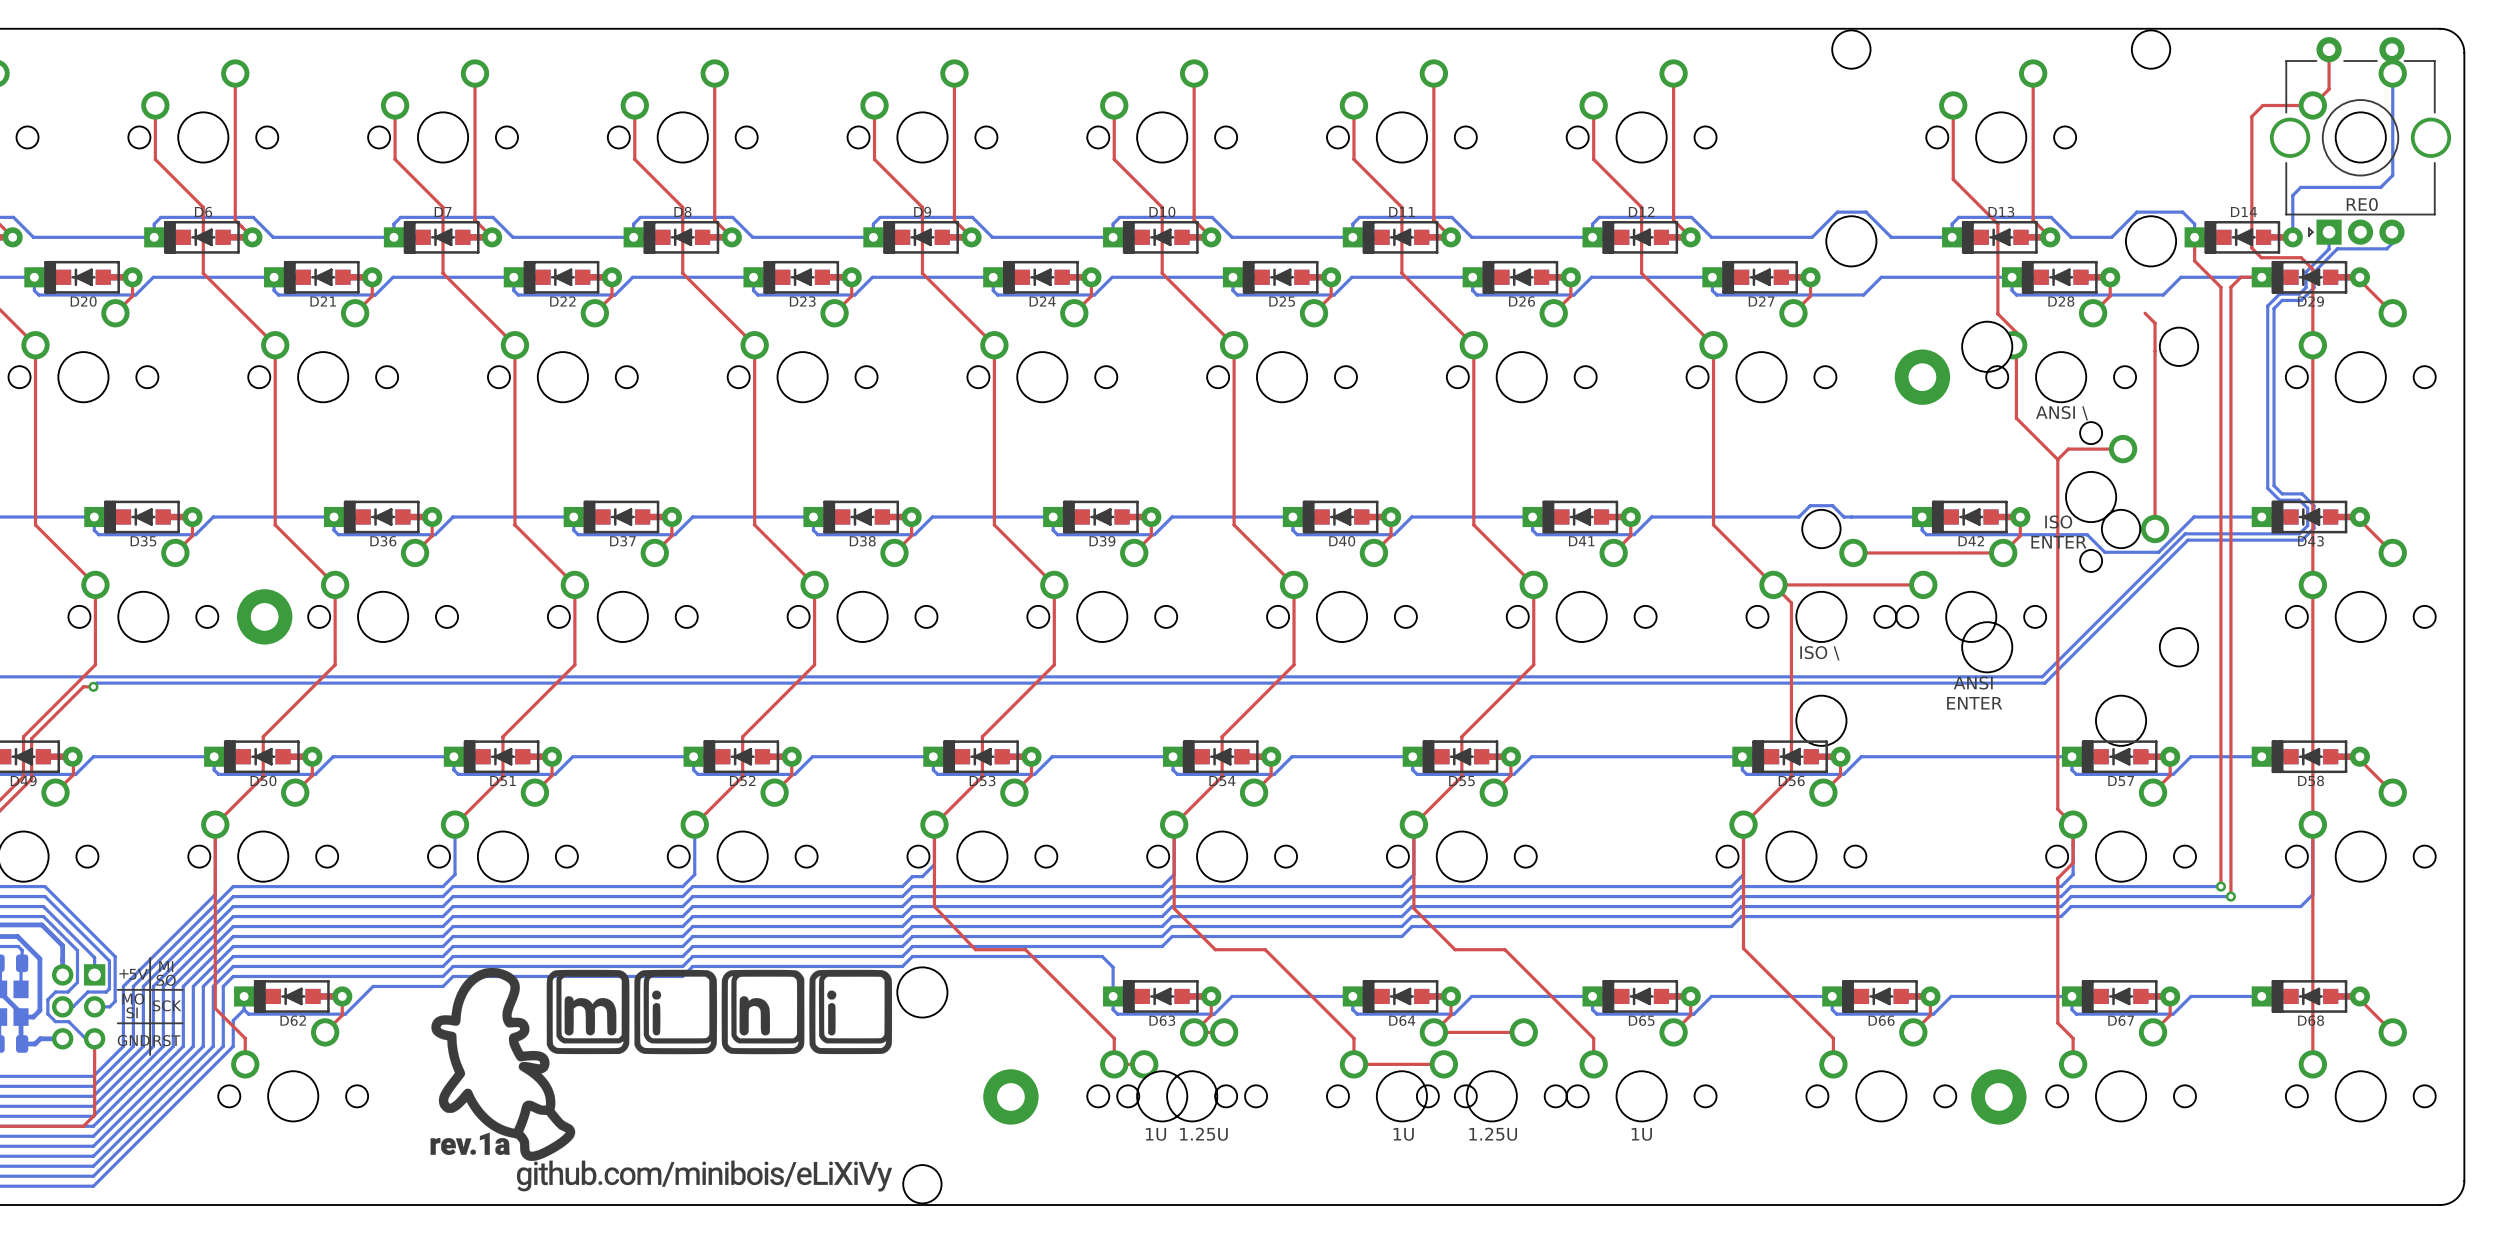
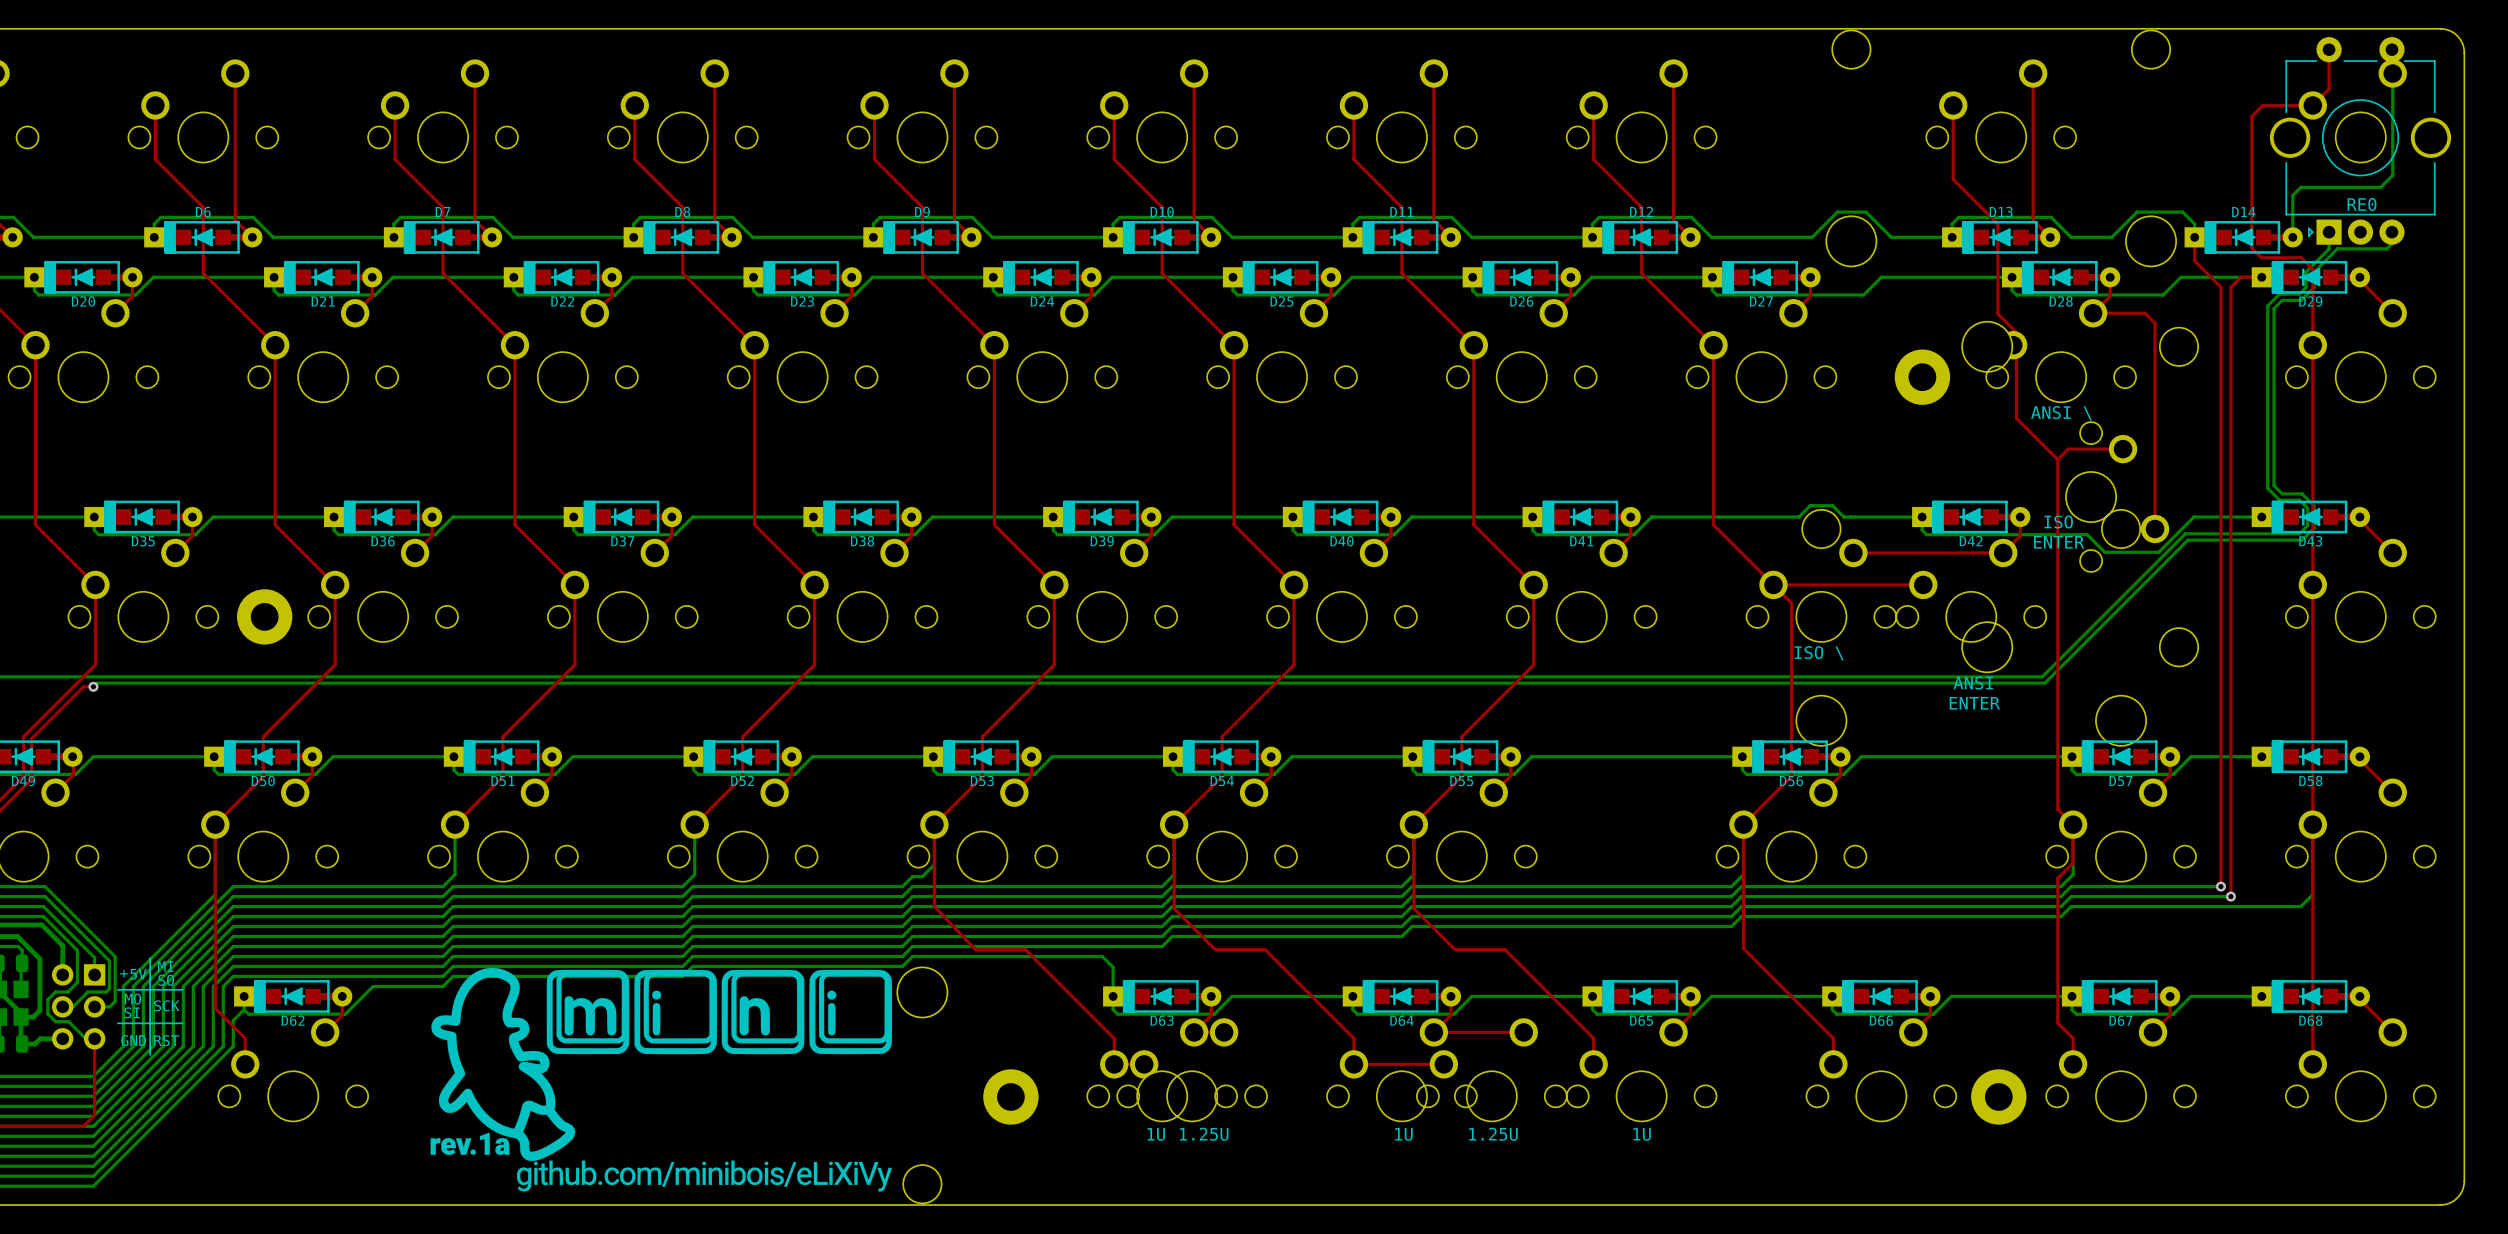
top track: none -> (2093, 313) (2145, 313)

